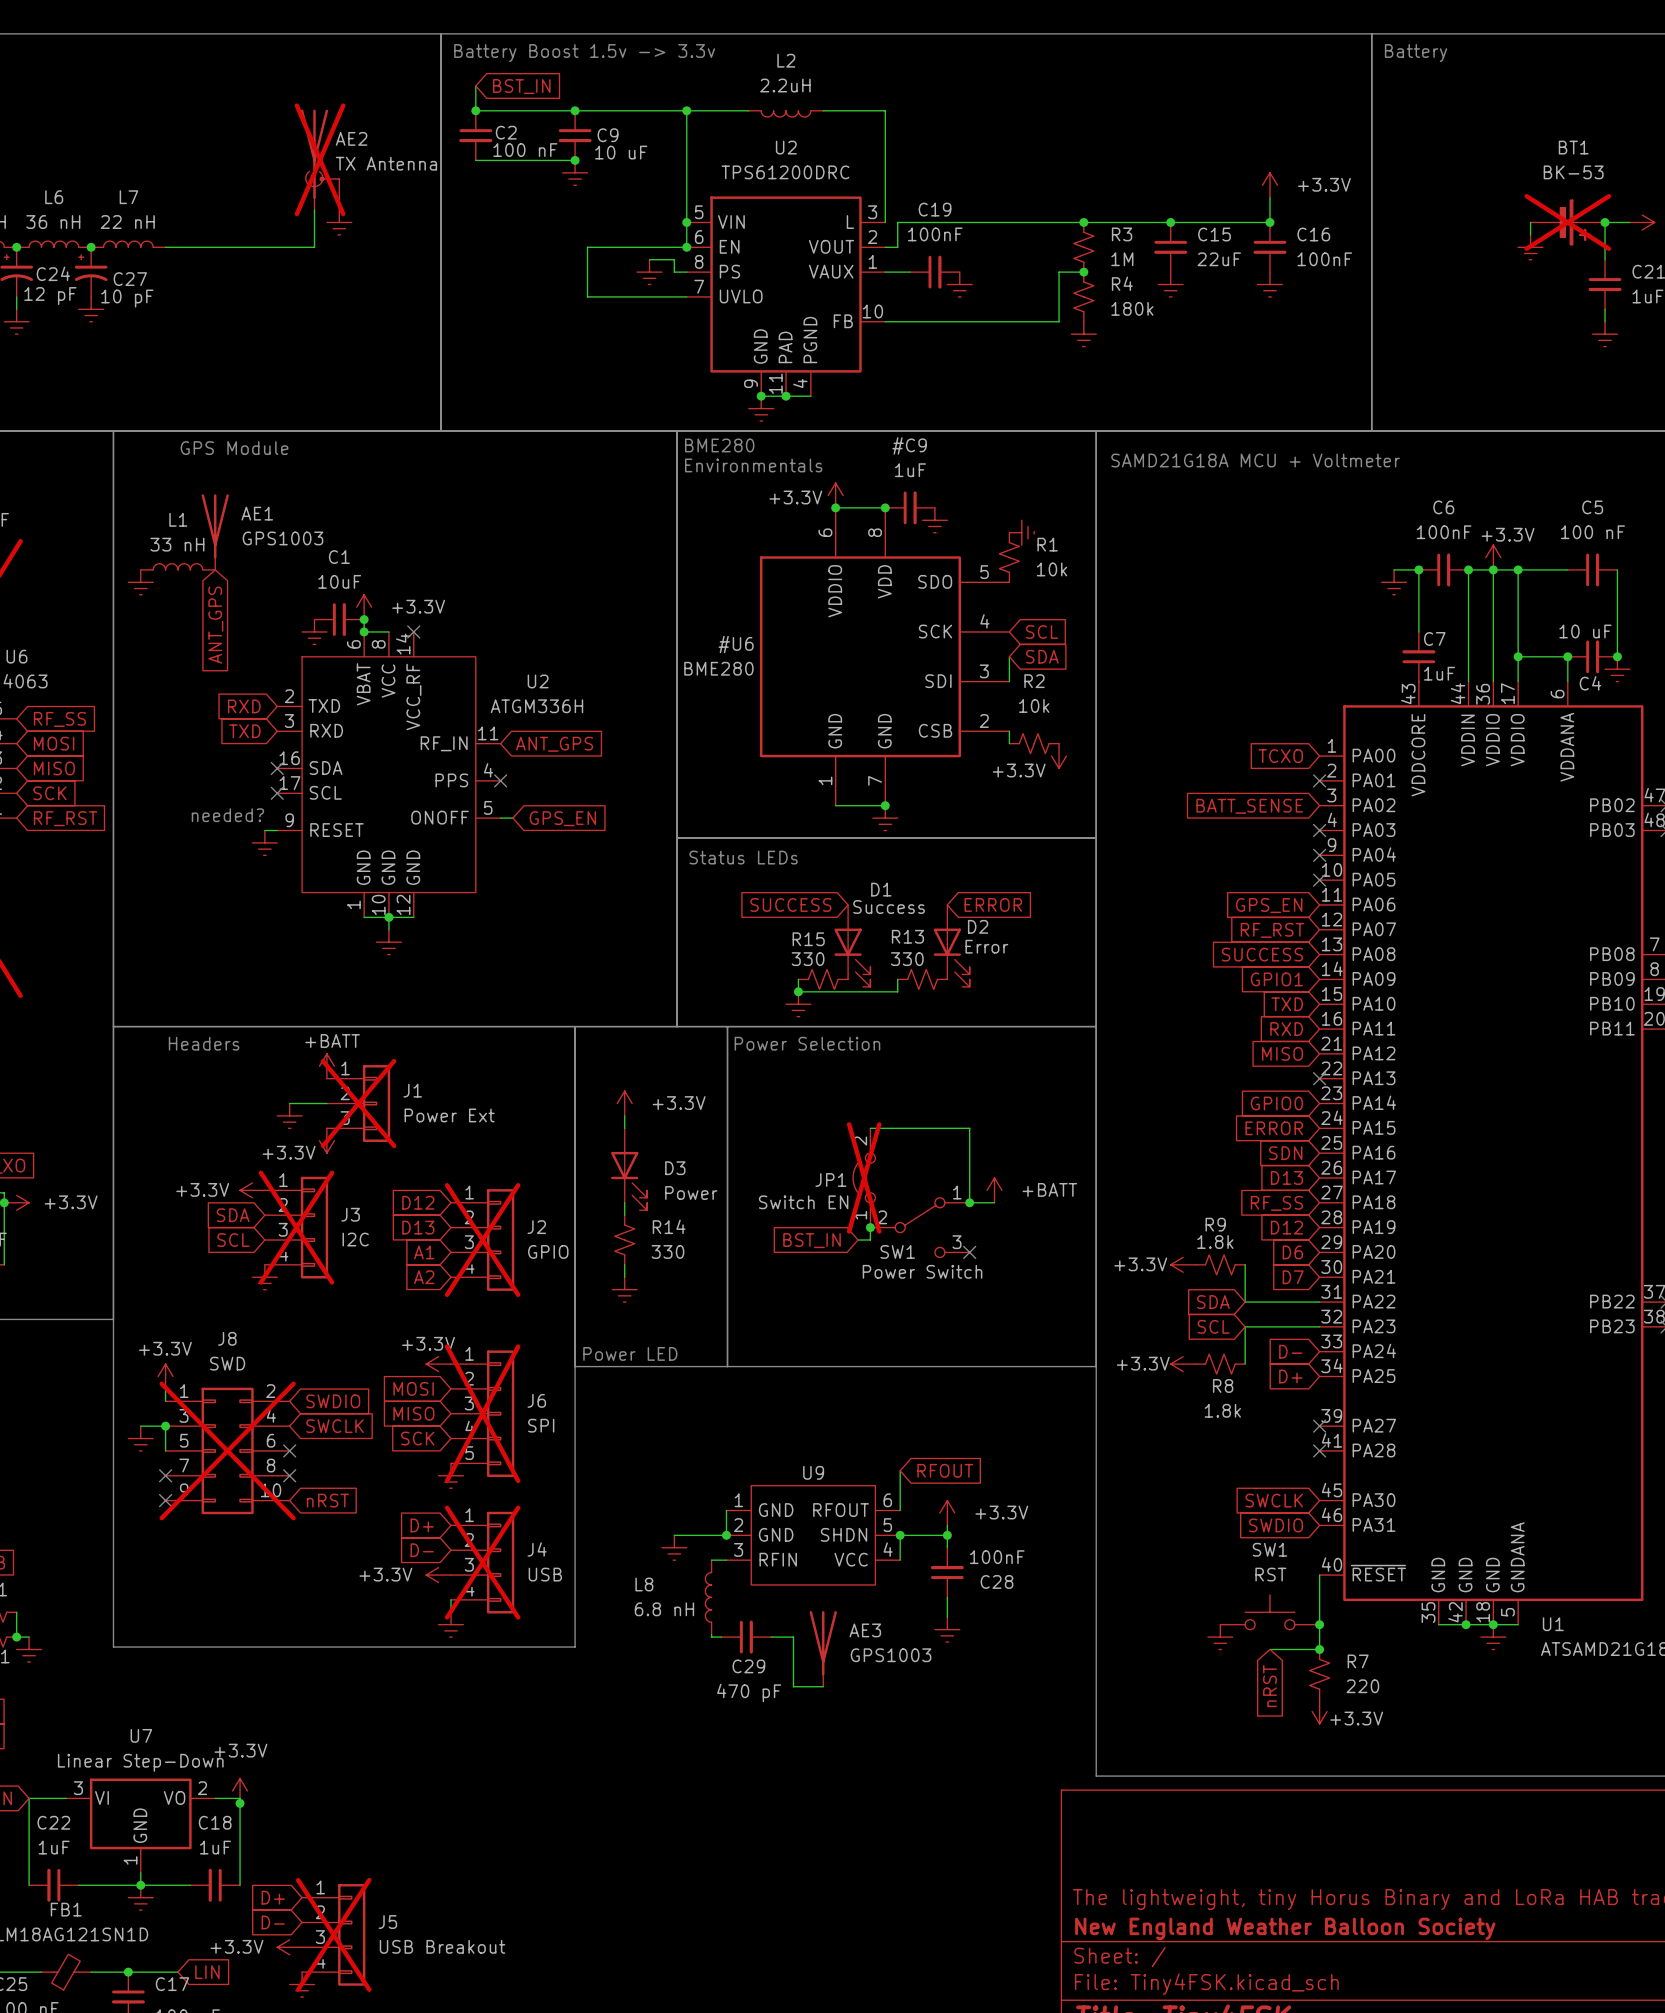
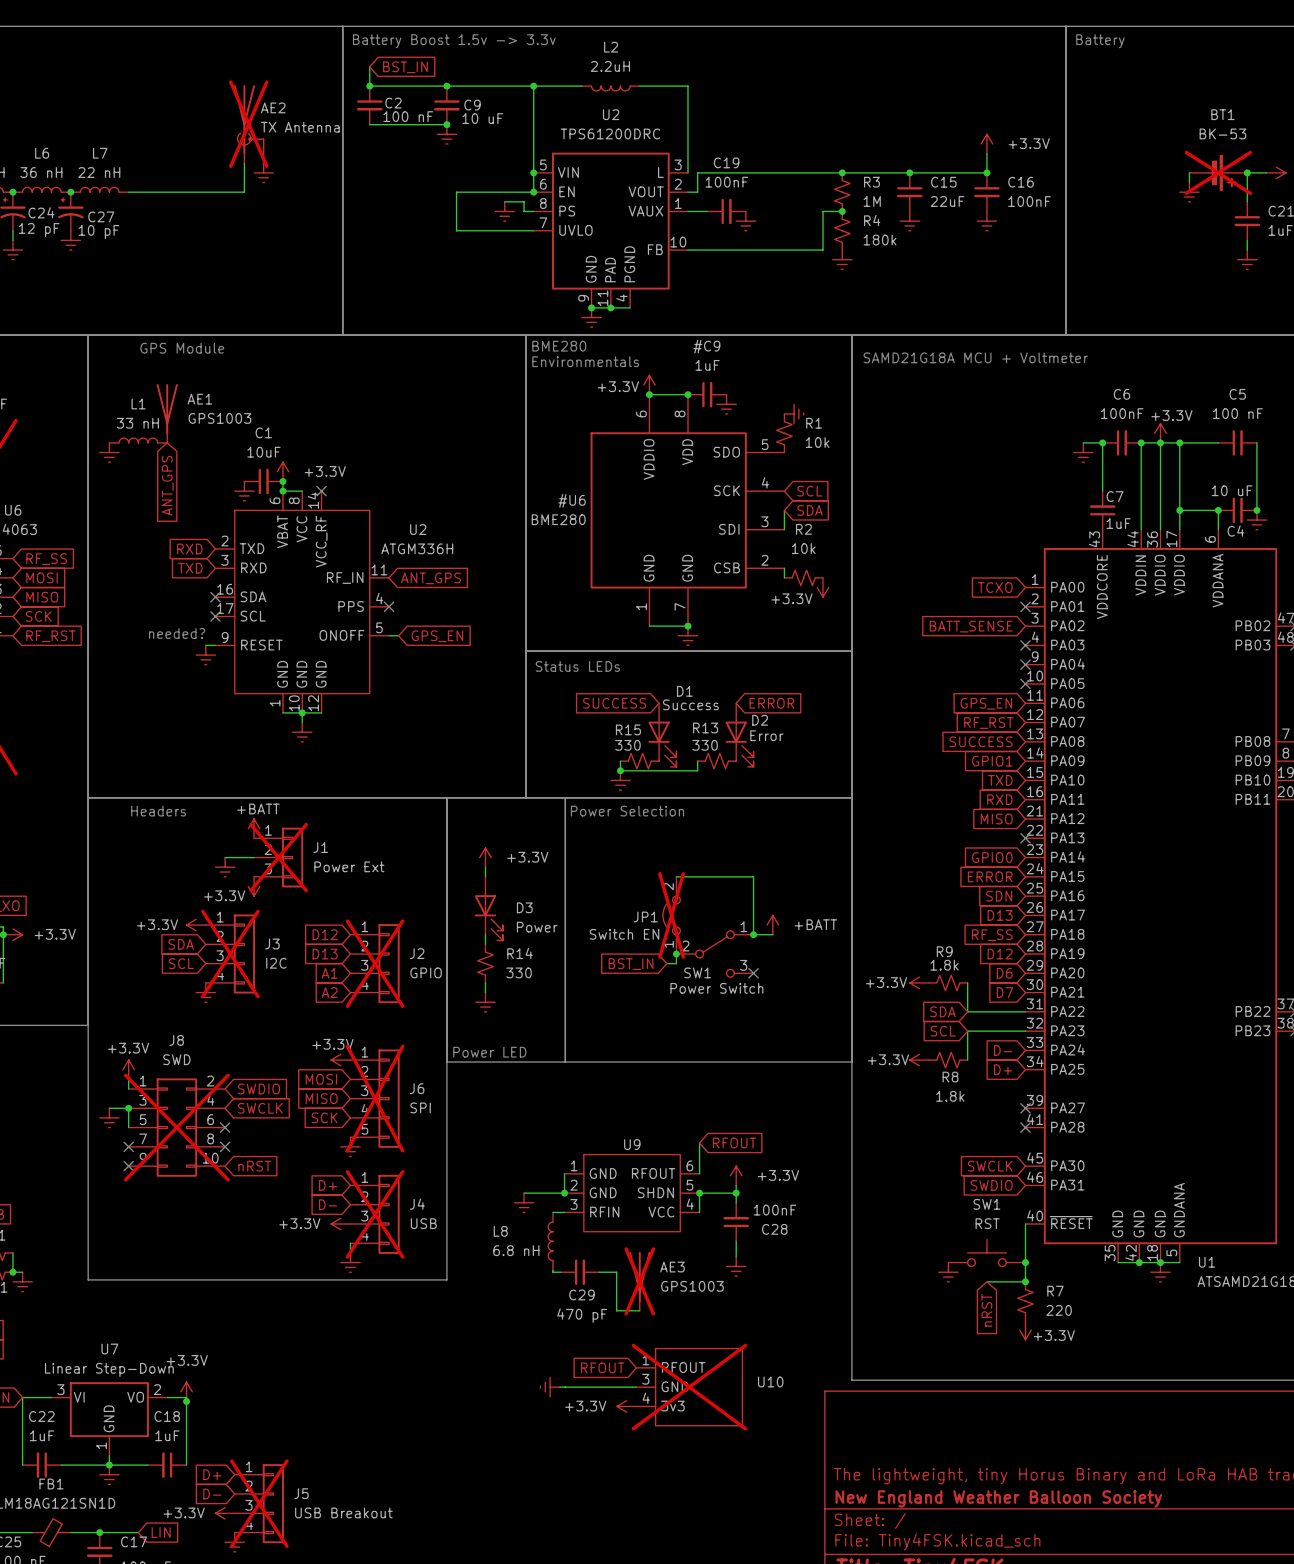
AE3 do-not-place cross: none -> (639, 1281)
global label: none -> RFOUT (602, 1367)
power symbol: none -> (550, 1387)
wire: none -> (559, 1387) (565, 1387)
wire: none -> (565, 1387) (636, 1387)
U10: none -> (689, 1387)
power symbol: none -> +3.3V (626, 1406)

